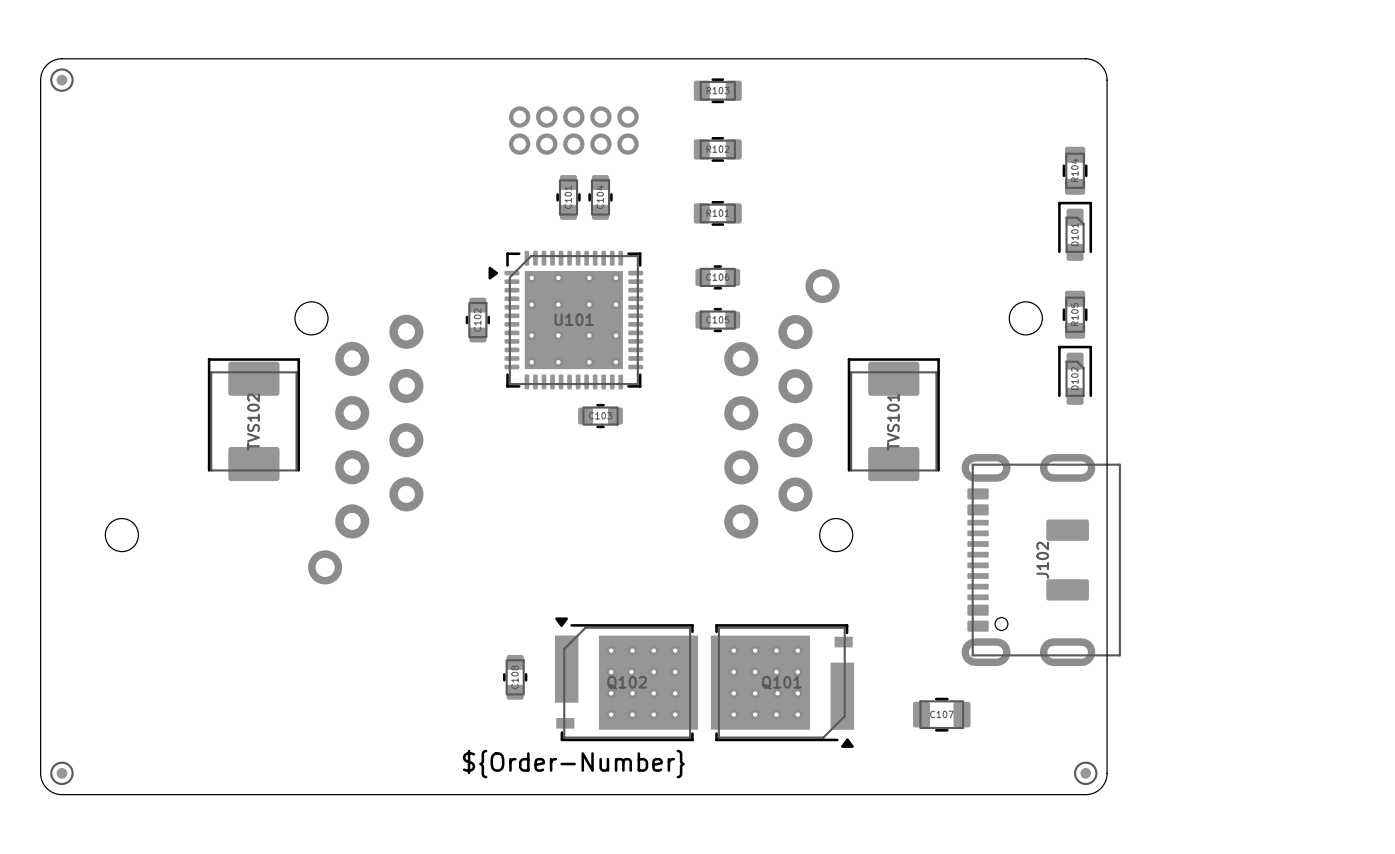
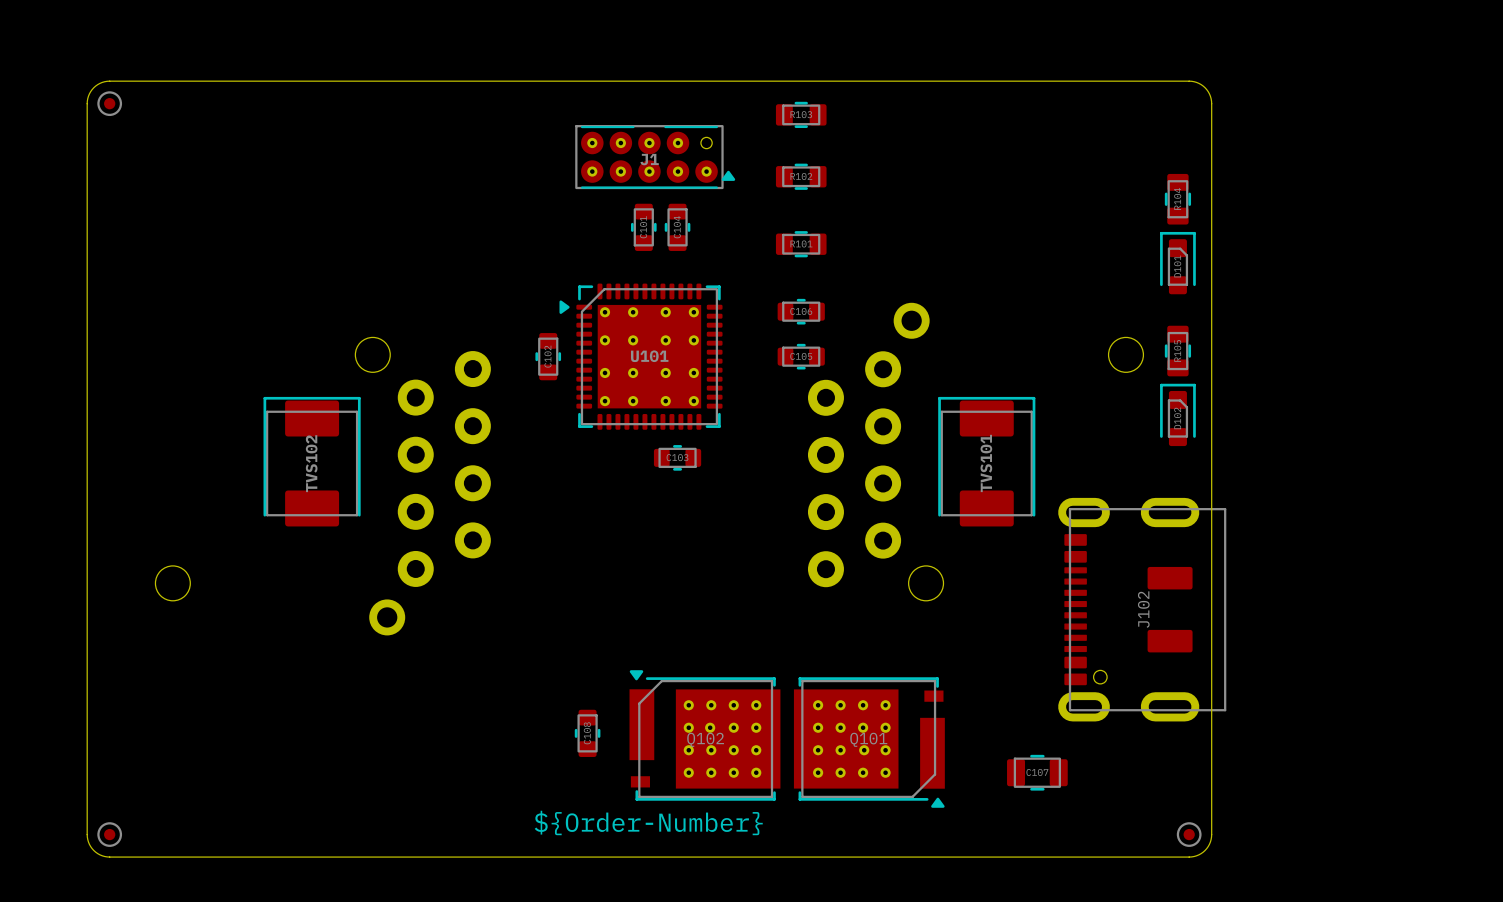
part: (573, 130) -> none
J1: none -> (655, 157)

